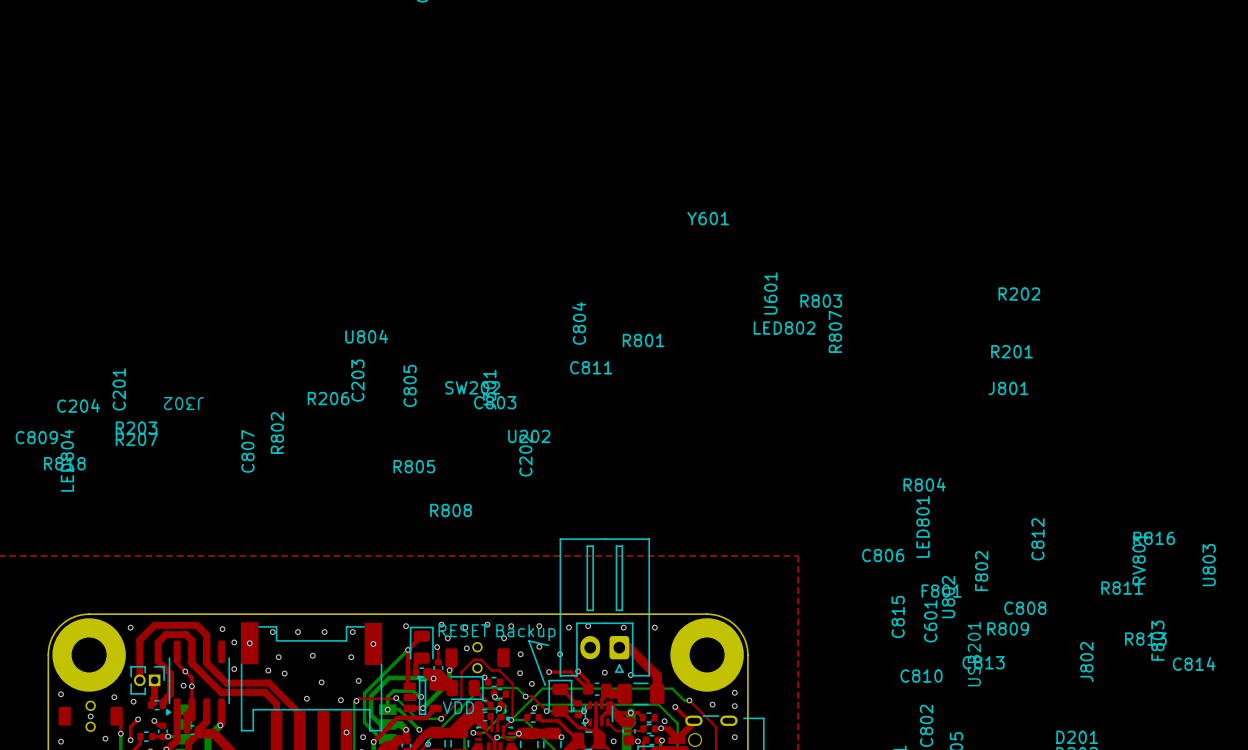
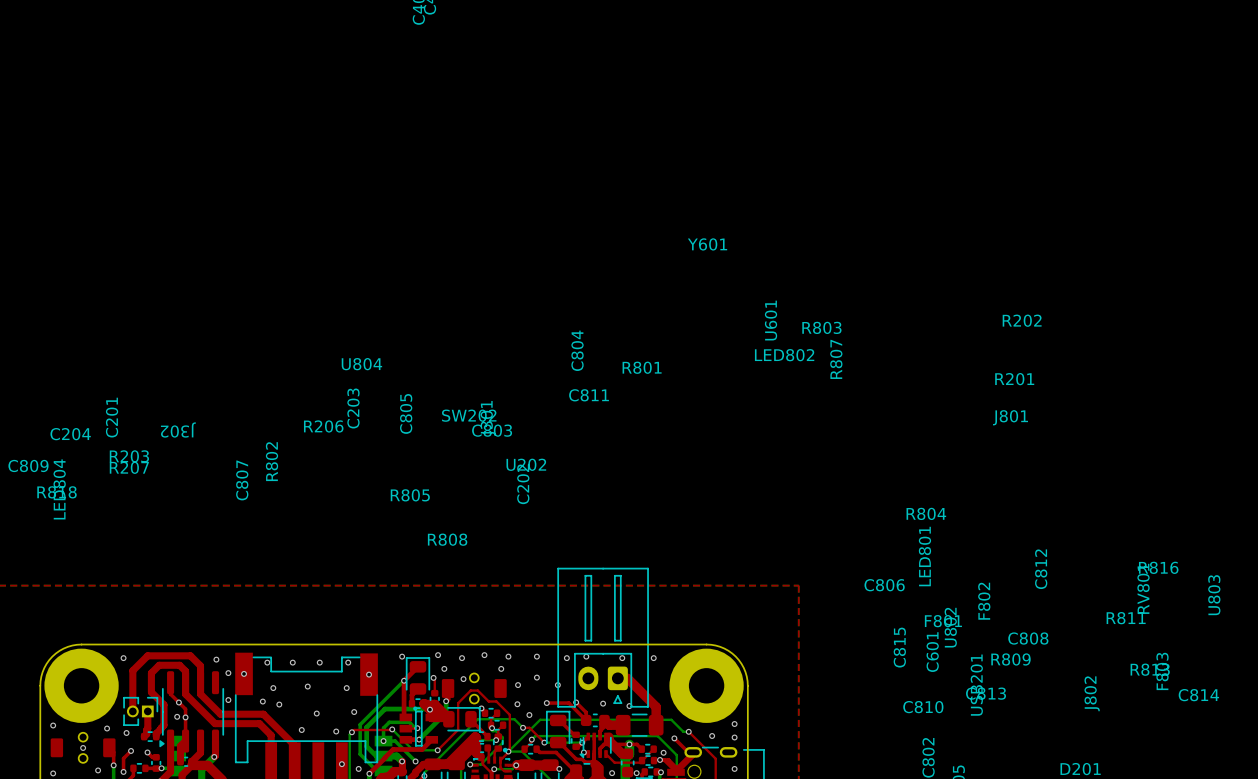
text: RESET (463, 630) -> none
text: Backup (525, 632) -> none
line: (548, 645) (528, 640) (545, 685) -> none
text: VDD (458, 707) -> none

